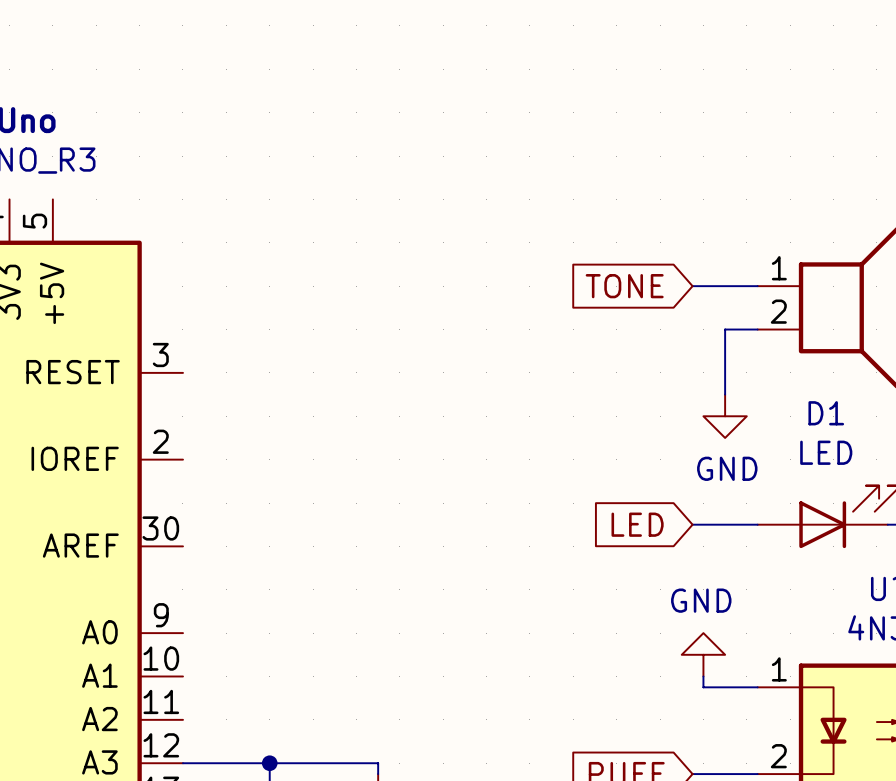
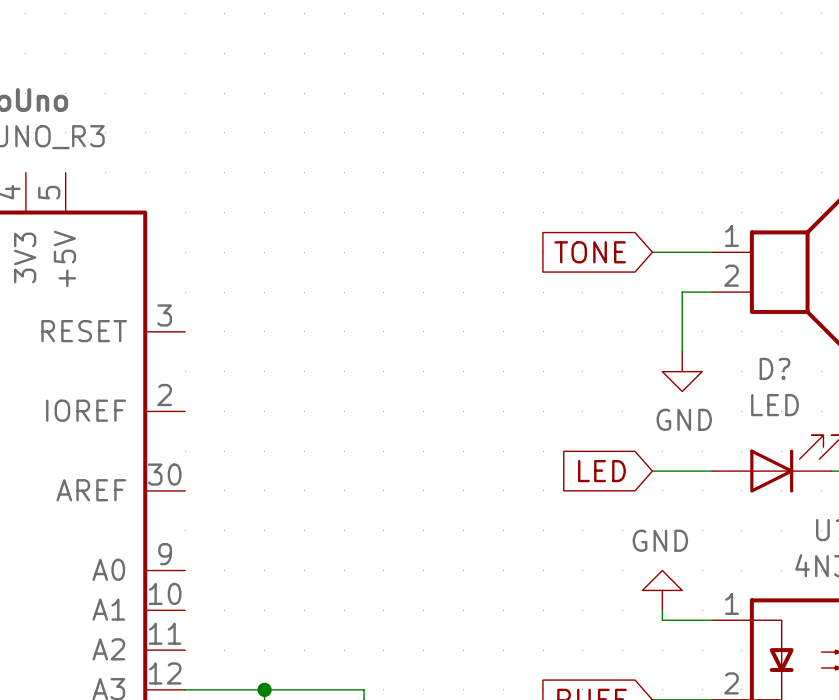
D1 name: D1 (826, 413) -> D? (775, 368)

